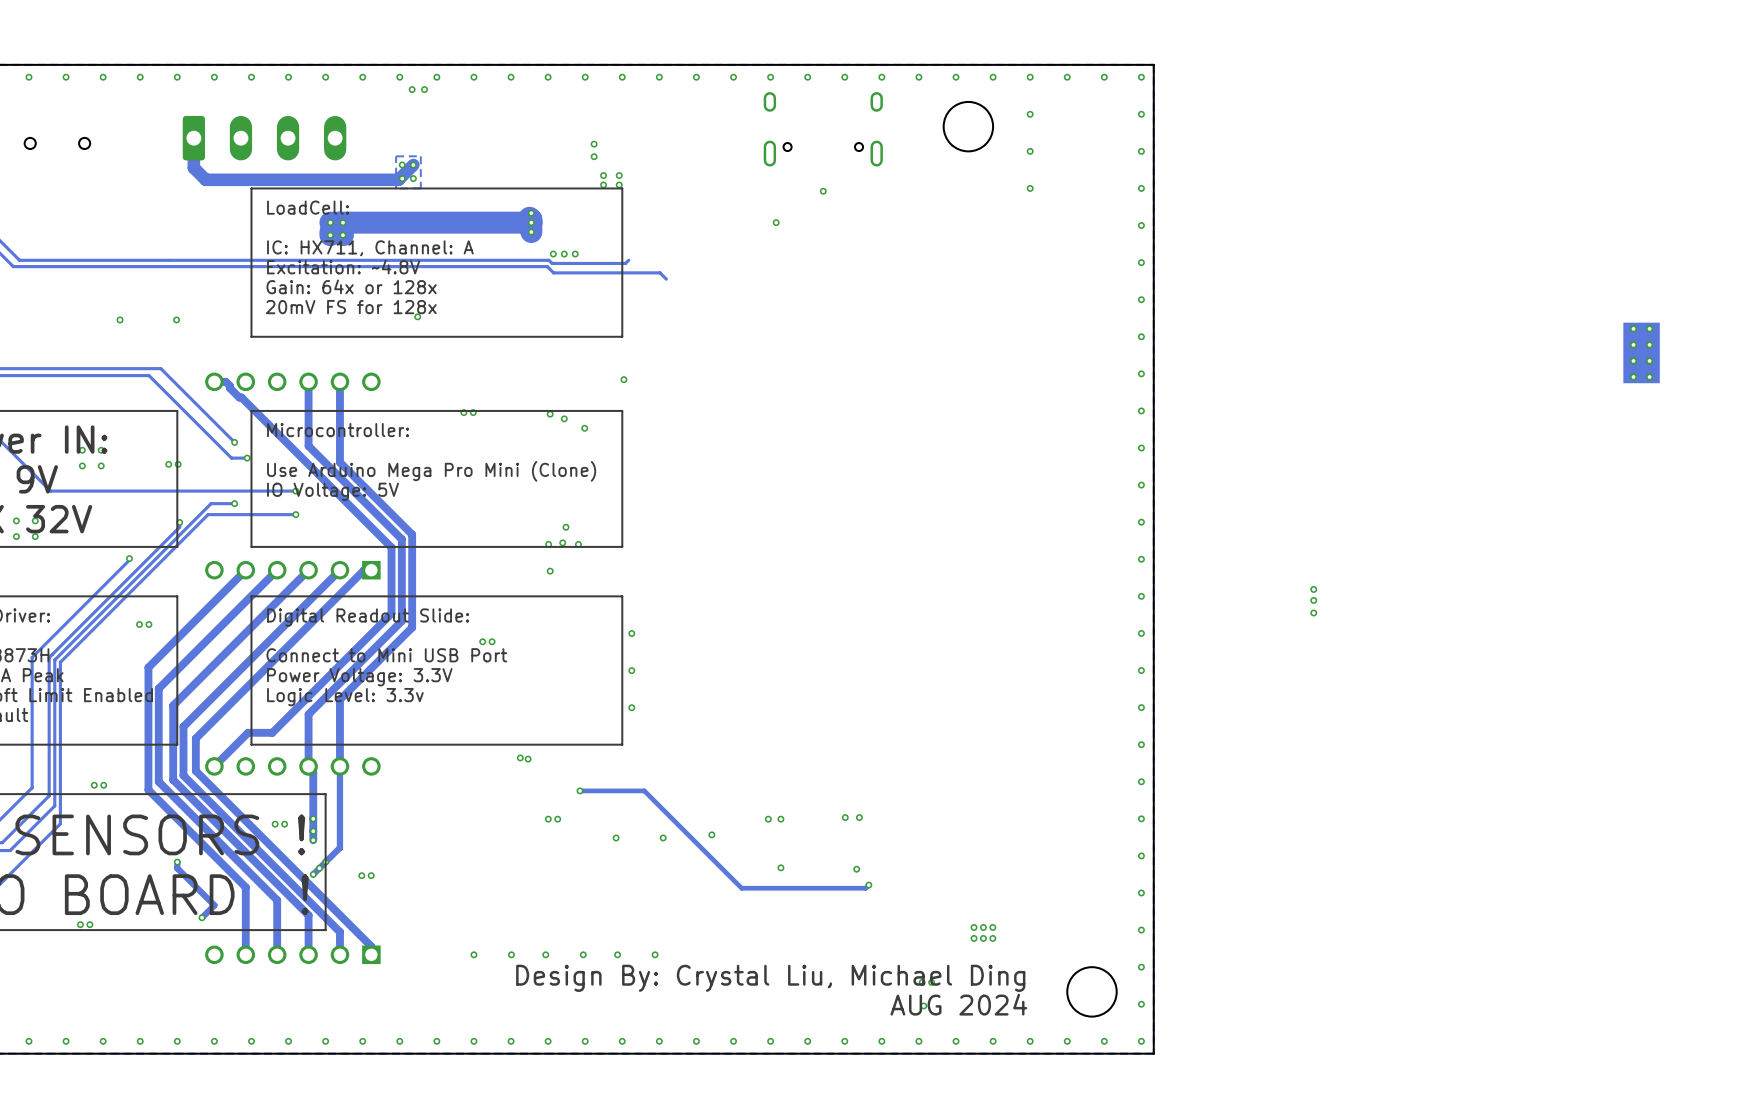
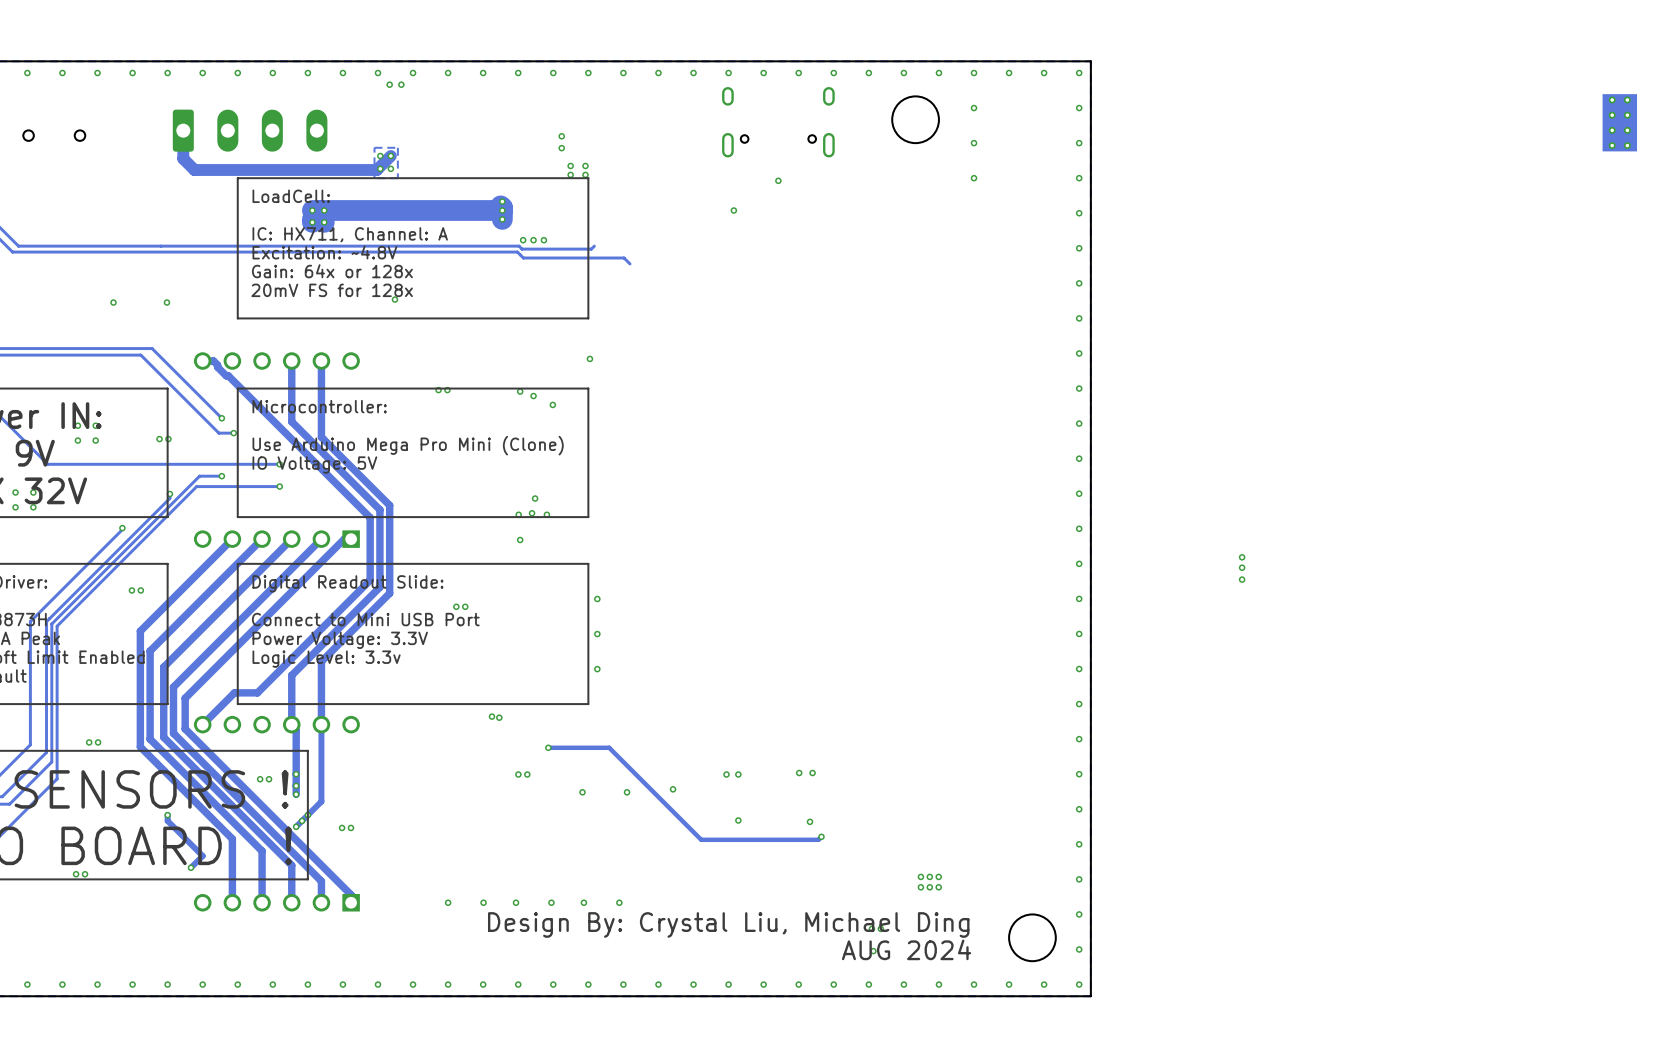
part position: (1641, 352) -> (1619, 122)

